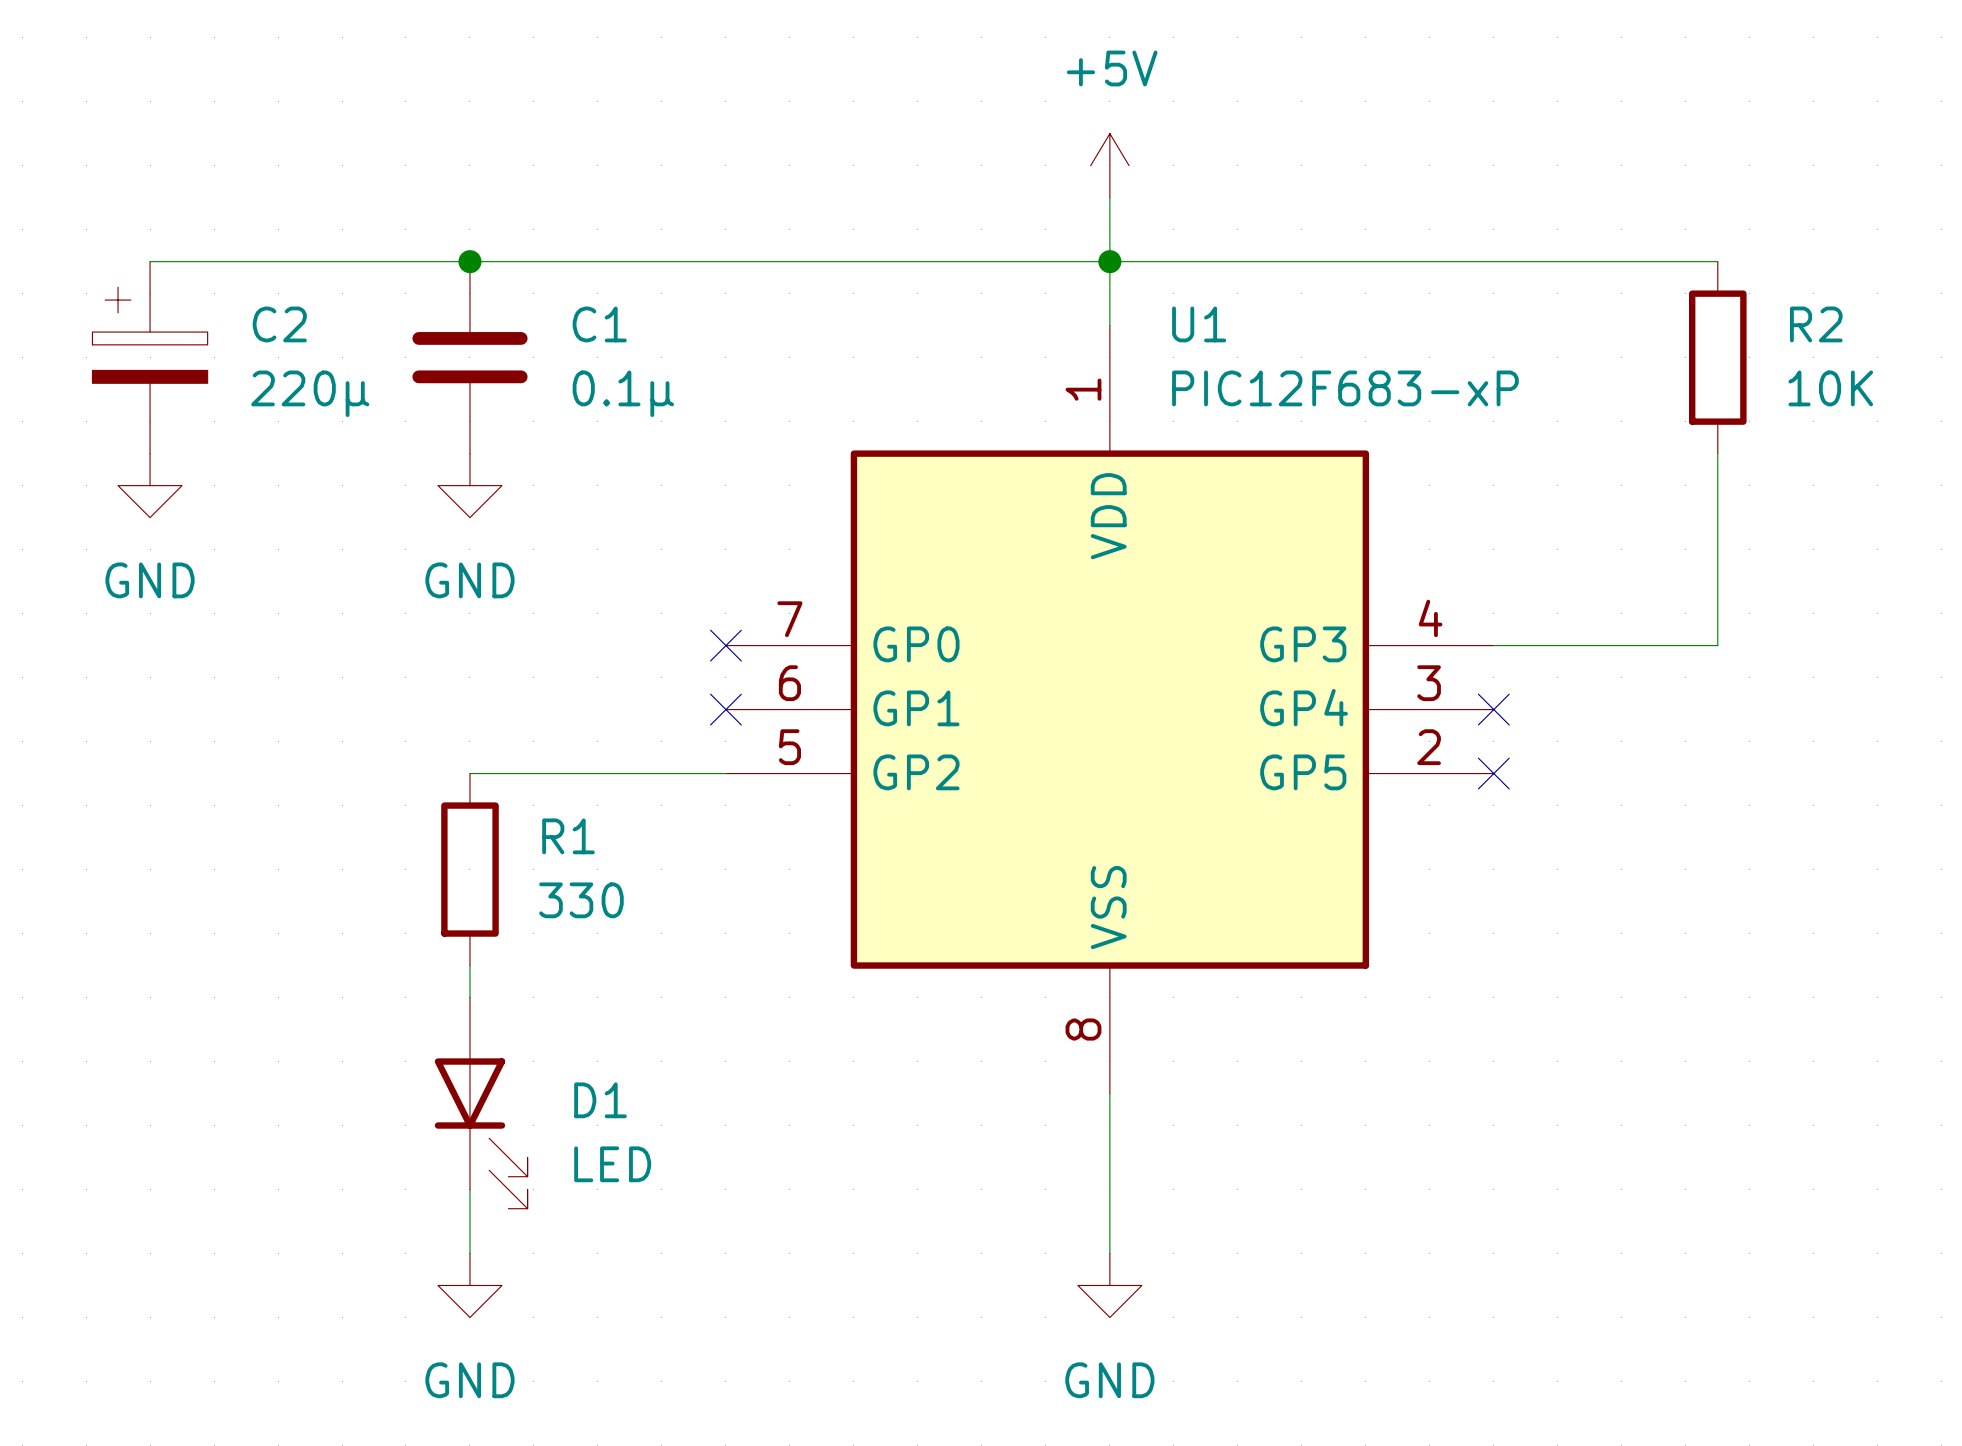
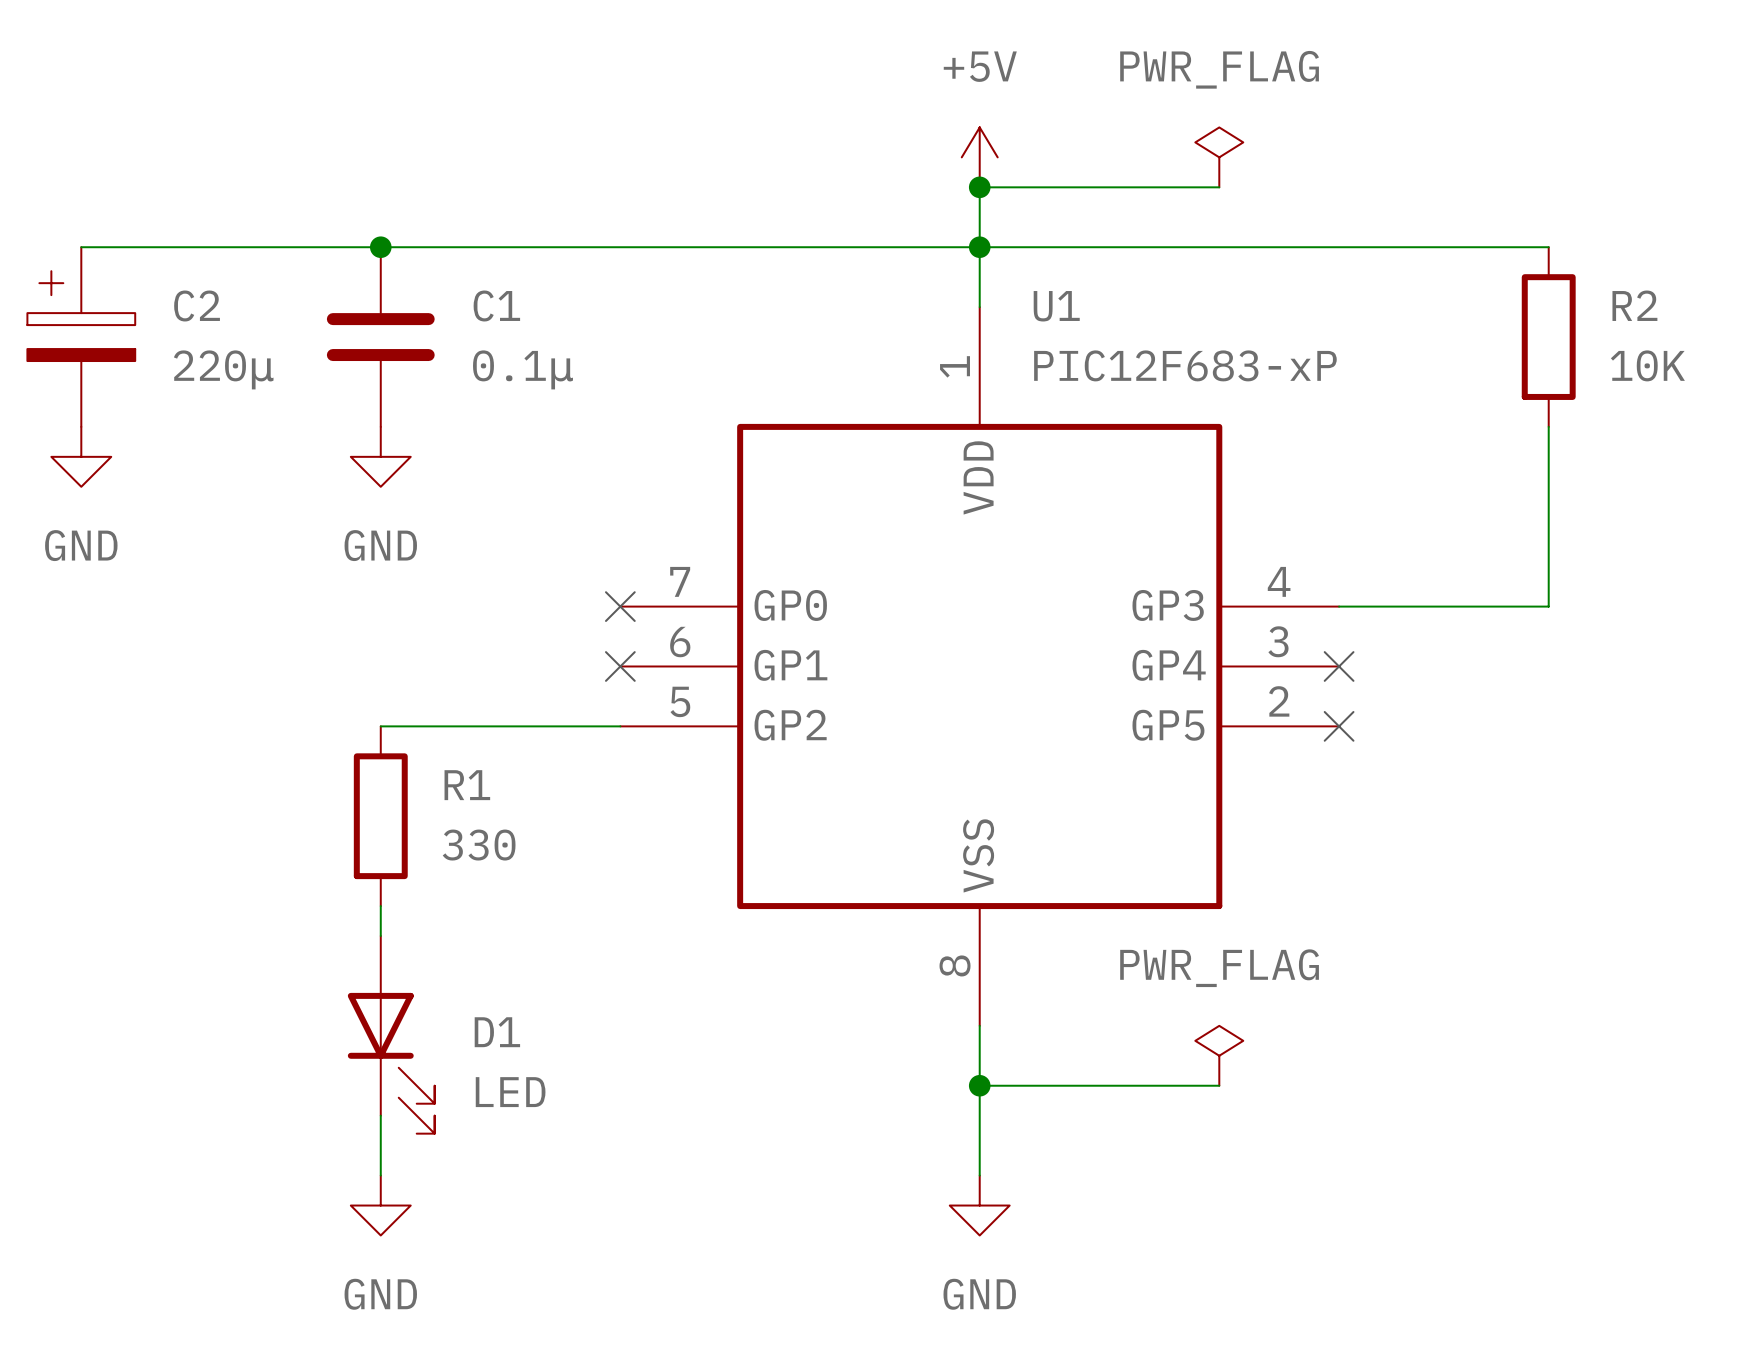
power symbol: none -> PWR_FLAG (1219, 157)
wire: none -> (979, 187) (1219, 187)
junction: none -> (979, 187)
power symbol: none -> PWR_FLAG (1219, 1055)
wire: none -> (979, 1085) (1219, 1085)
junction: none -> (979, 1085)

